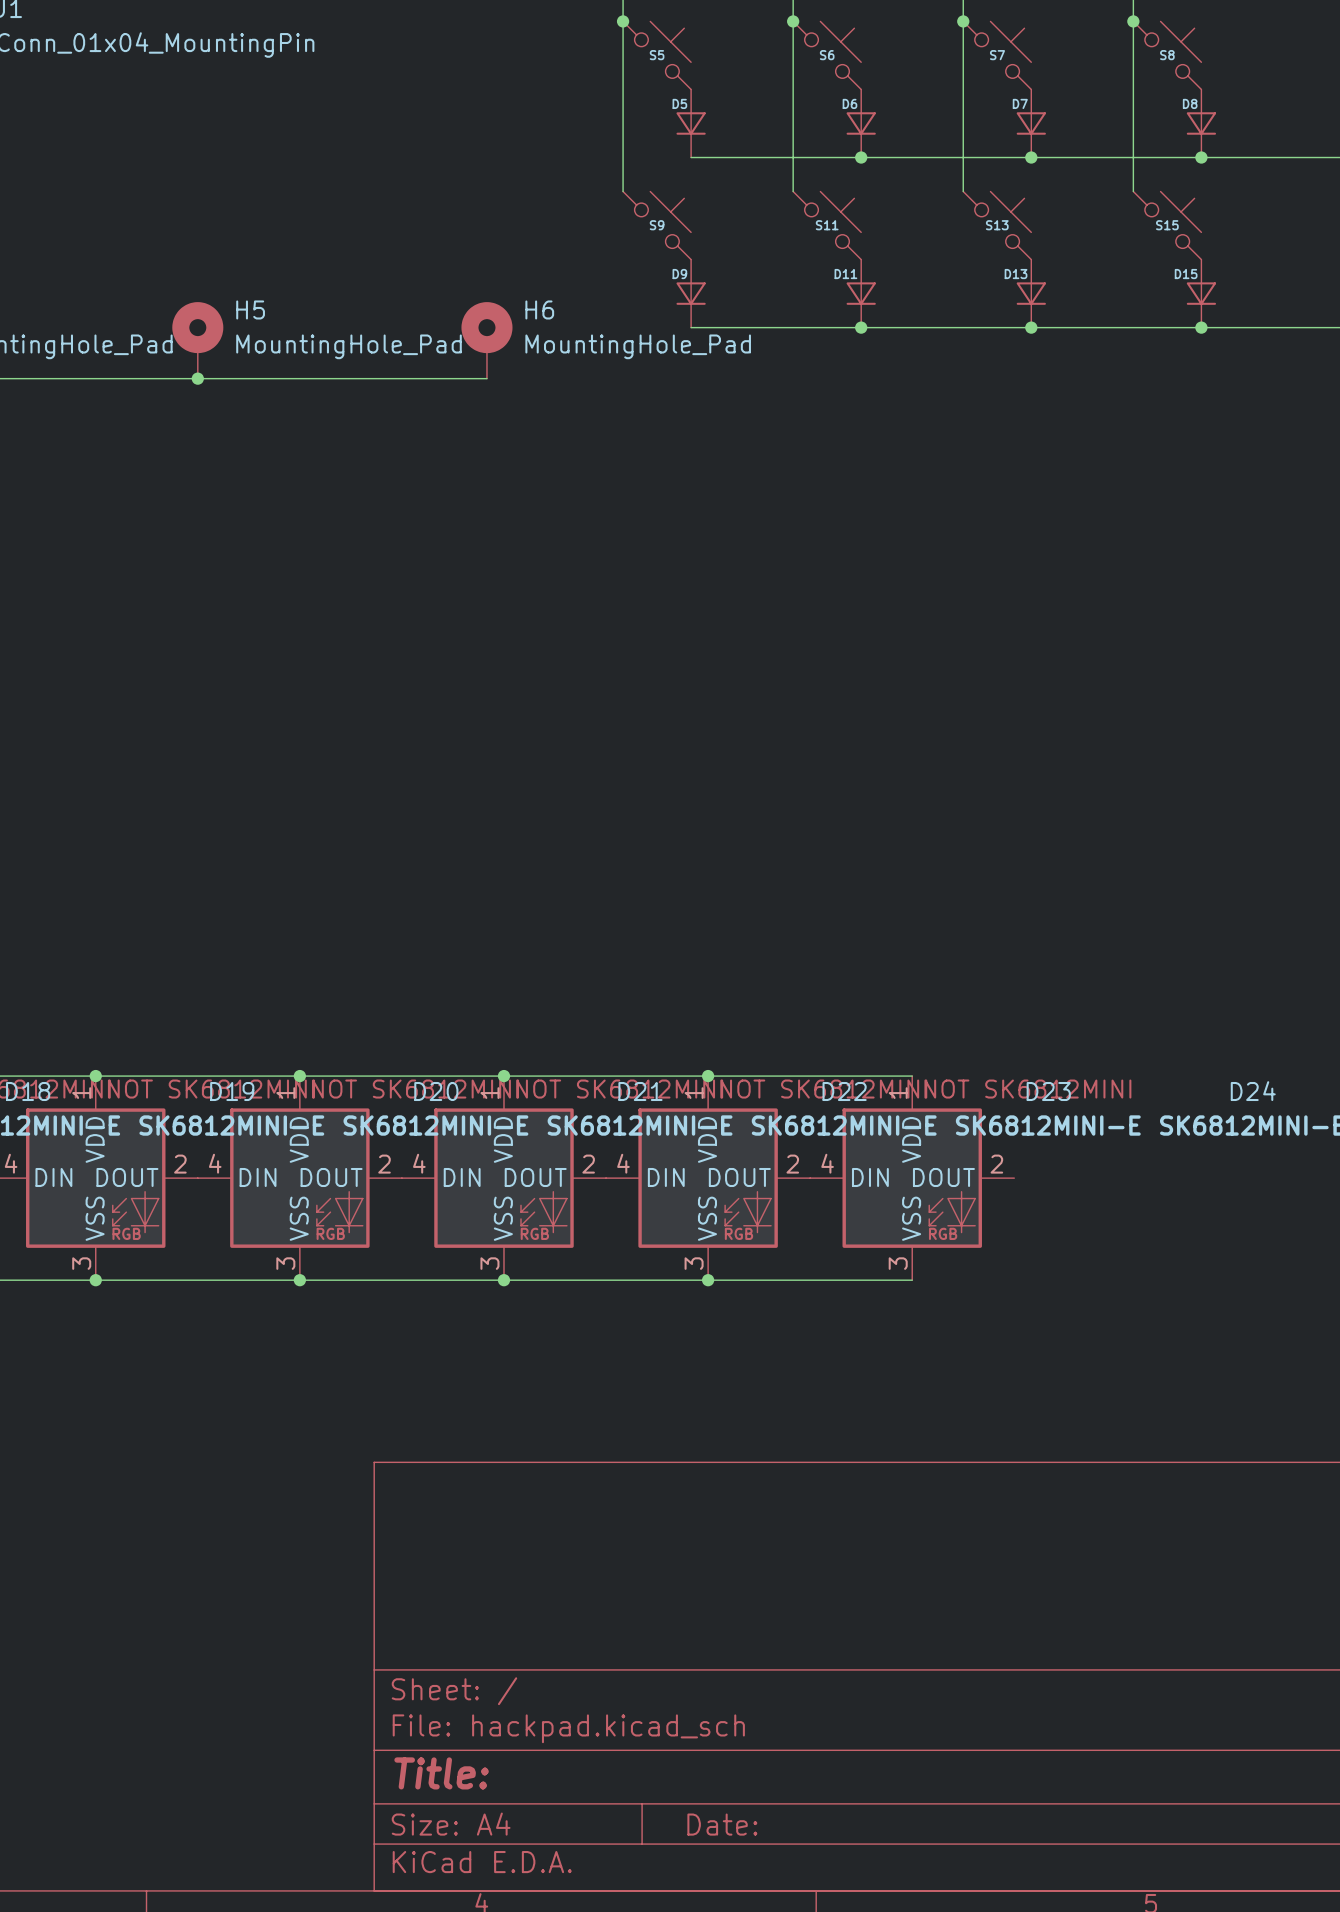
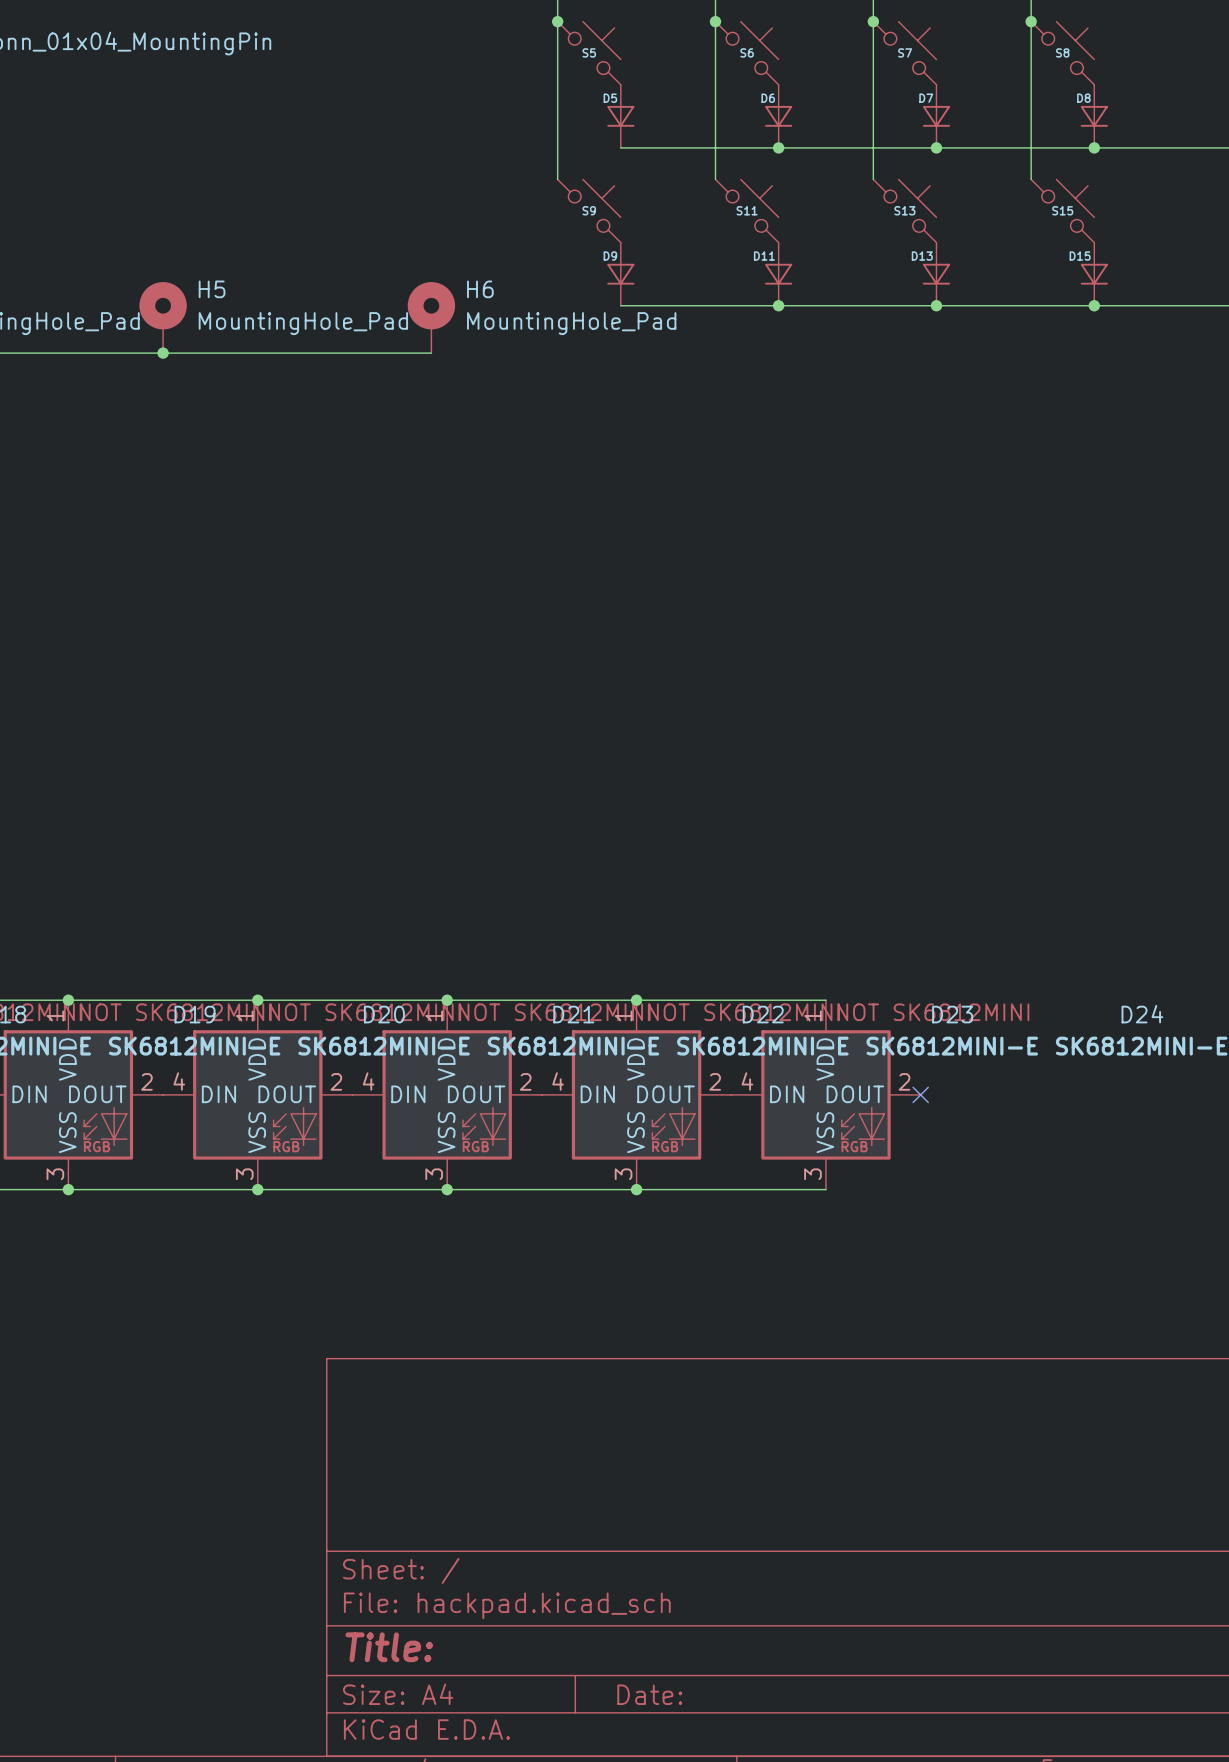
no-connect mark: none -> (920, 1094)

